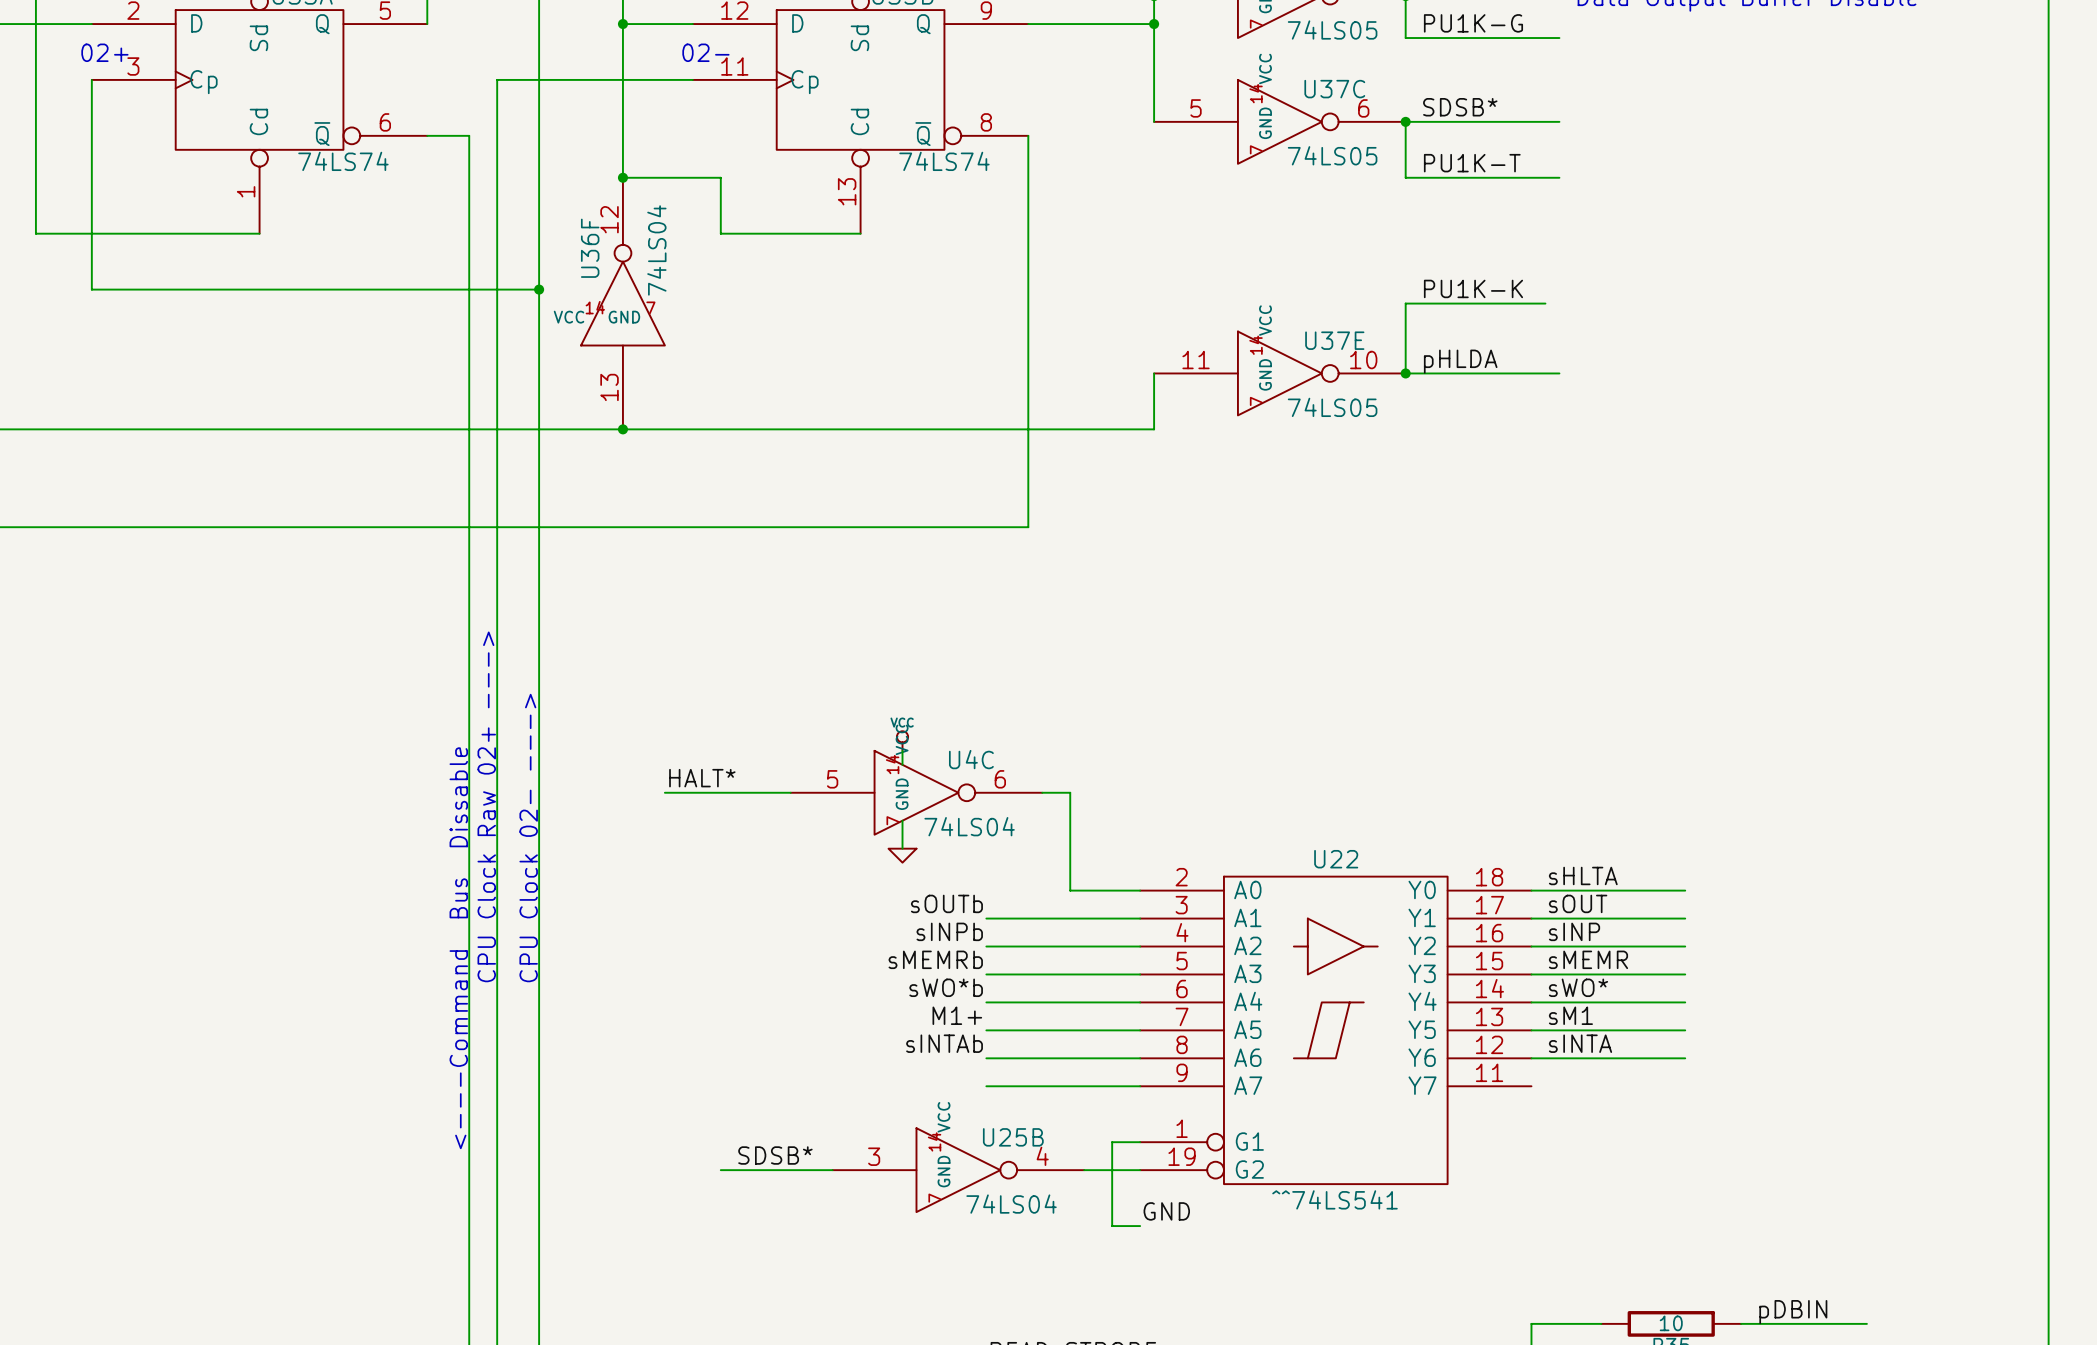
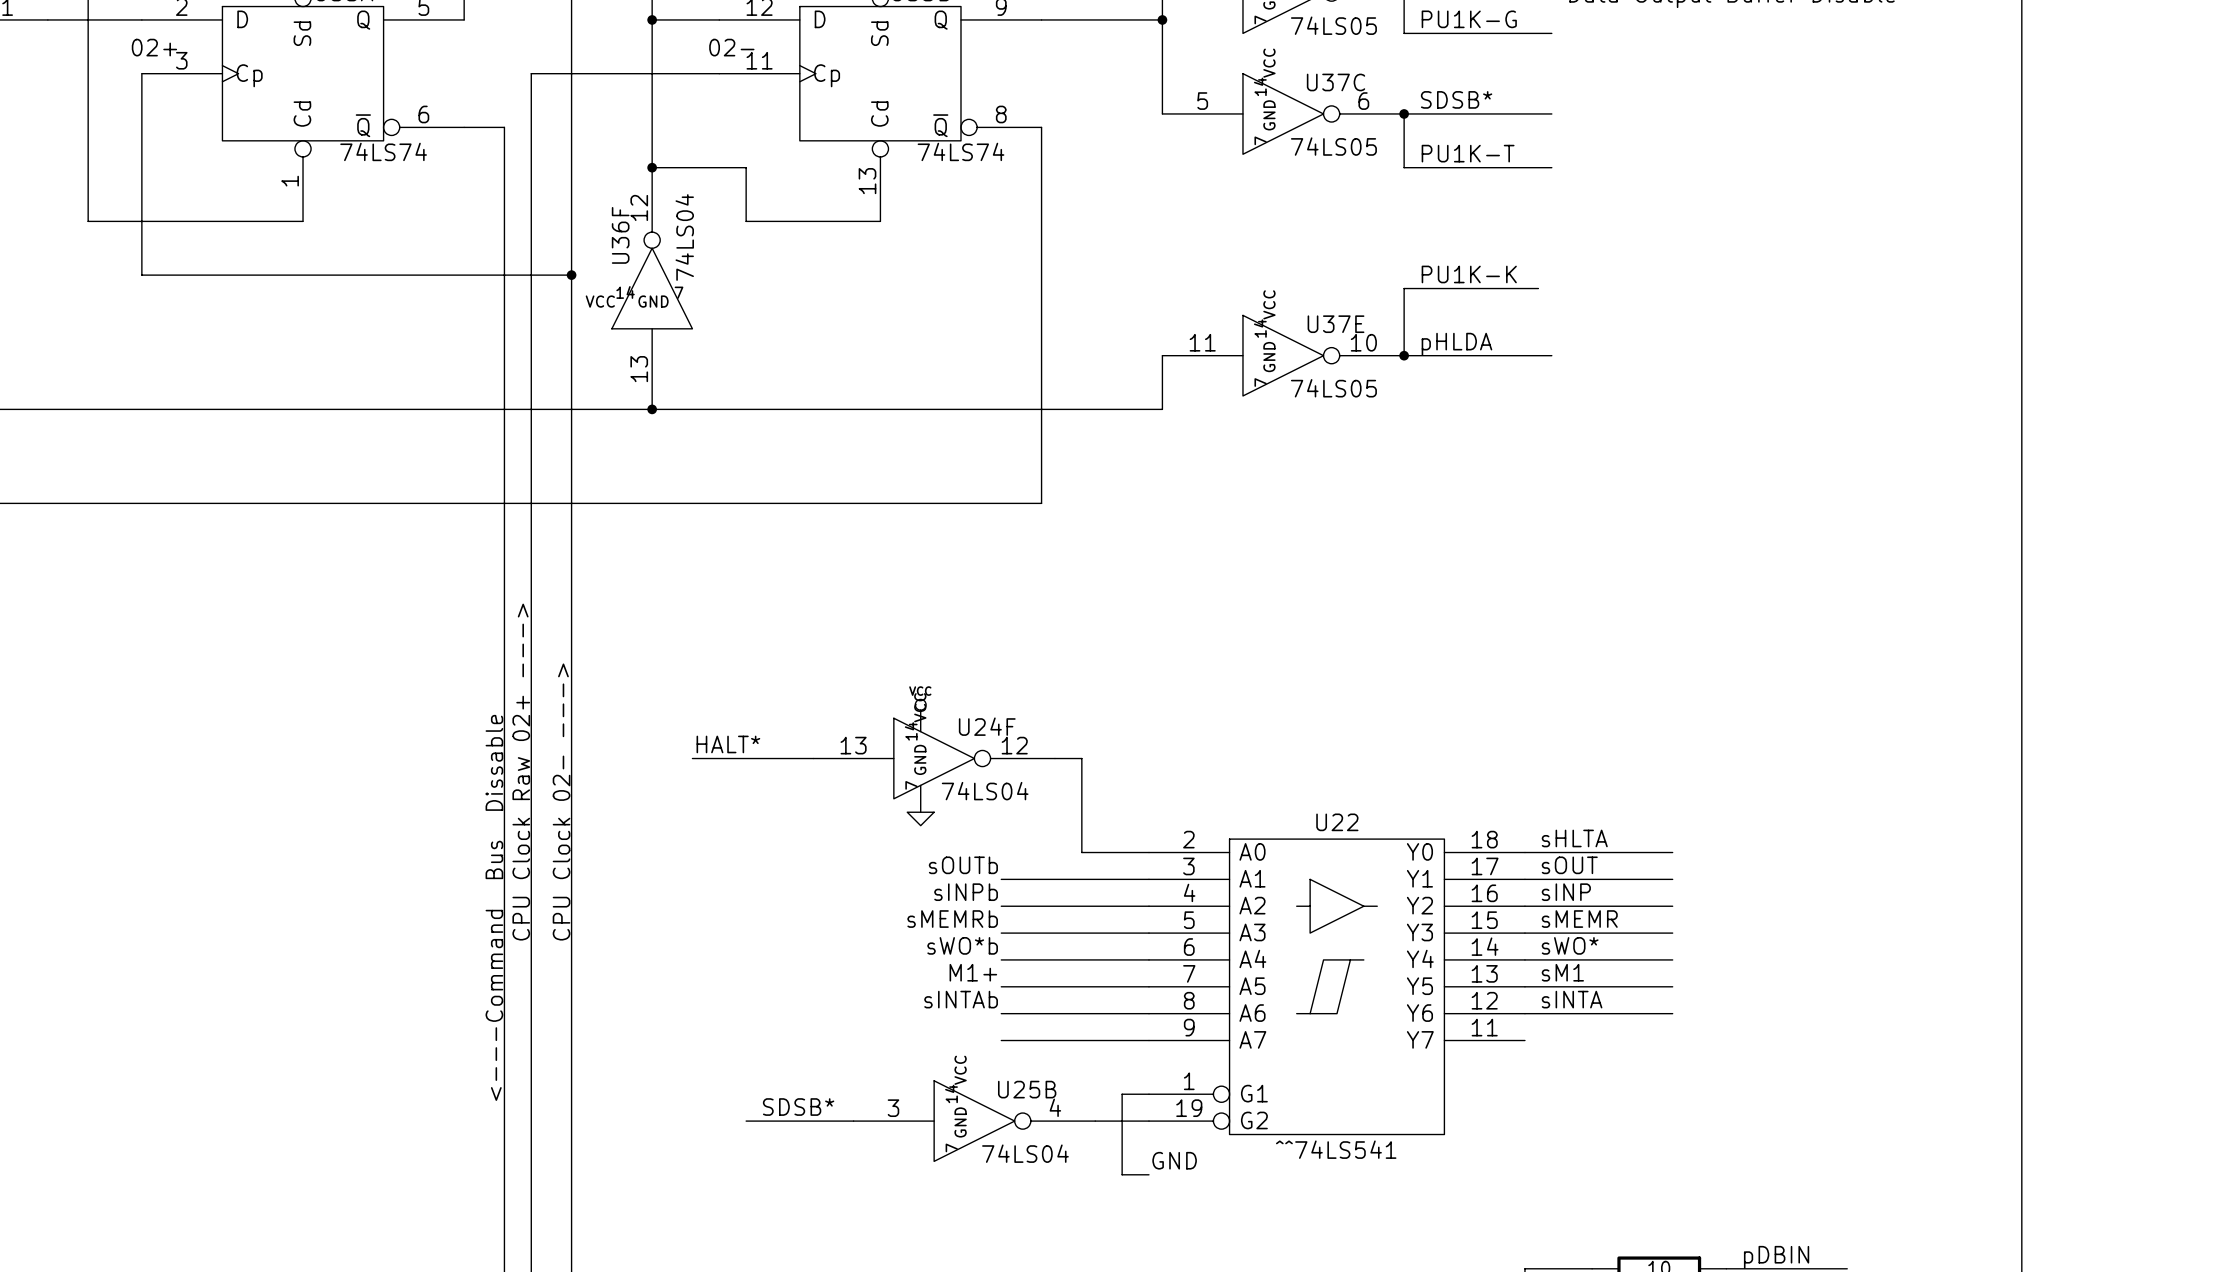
U4C name: U4C (971, 759) -> U24F (987, 726)
U4C pin number: 5 (832, 779) -> 13 (853, 745)
U4C pin number: 6 (1000, 779) -> 12 (1014, 745)

